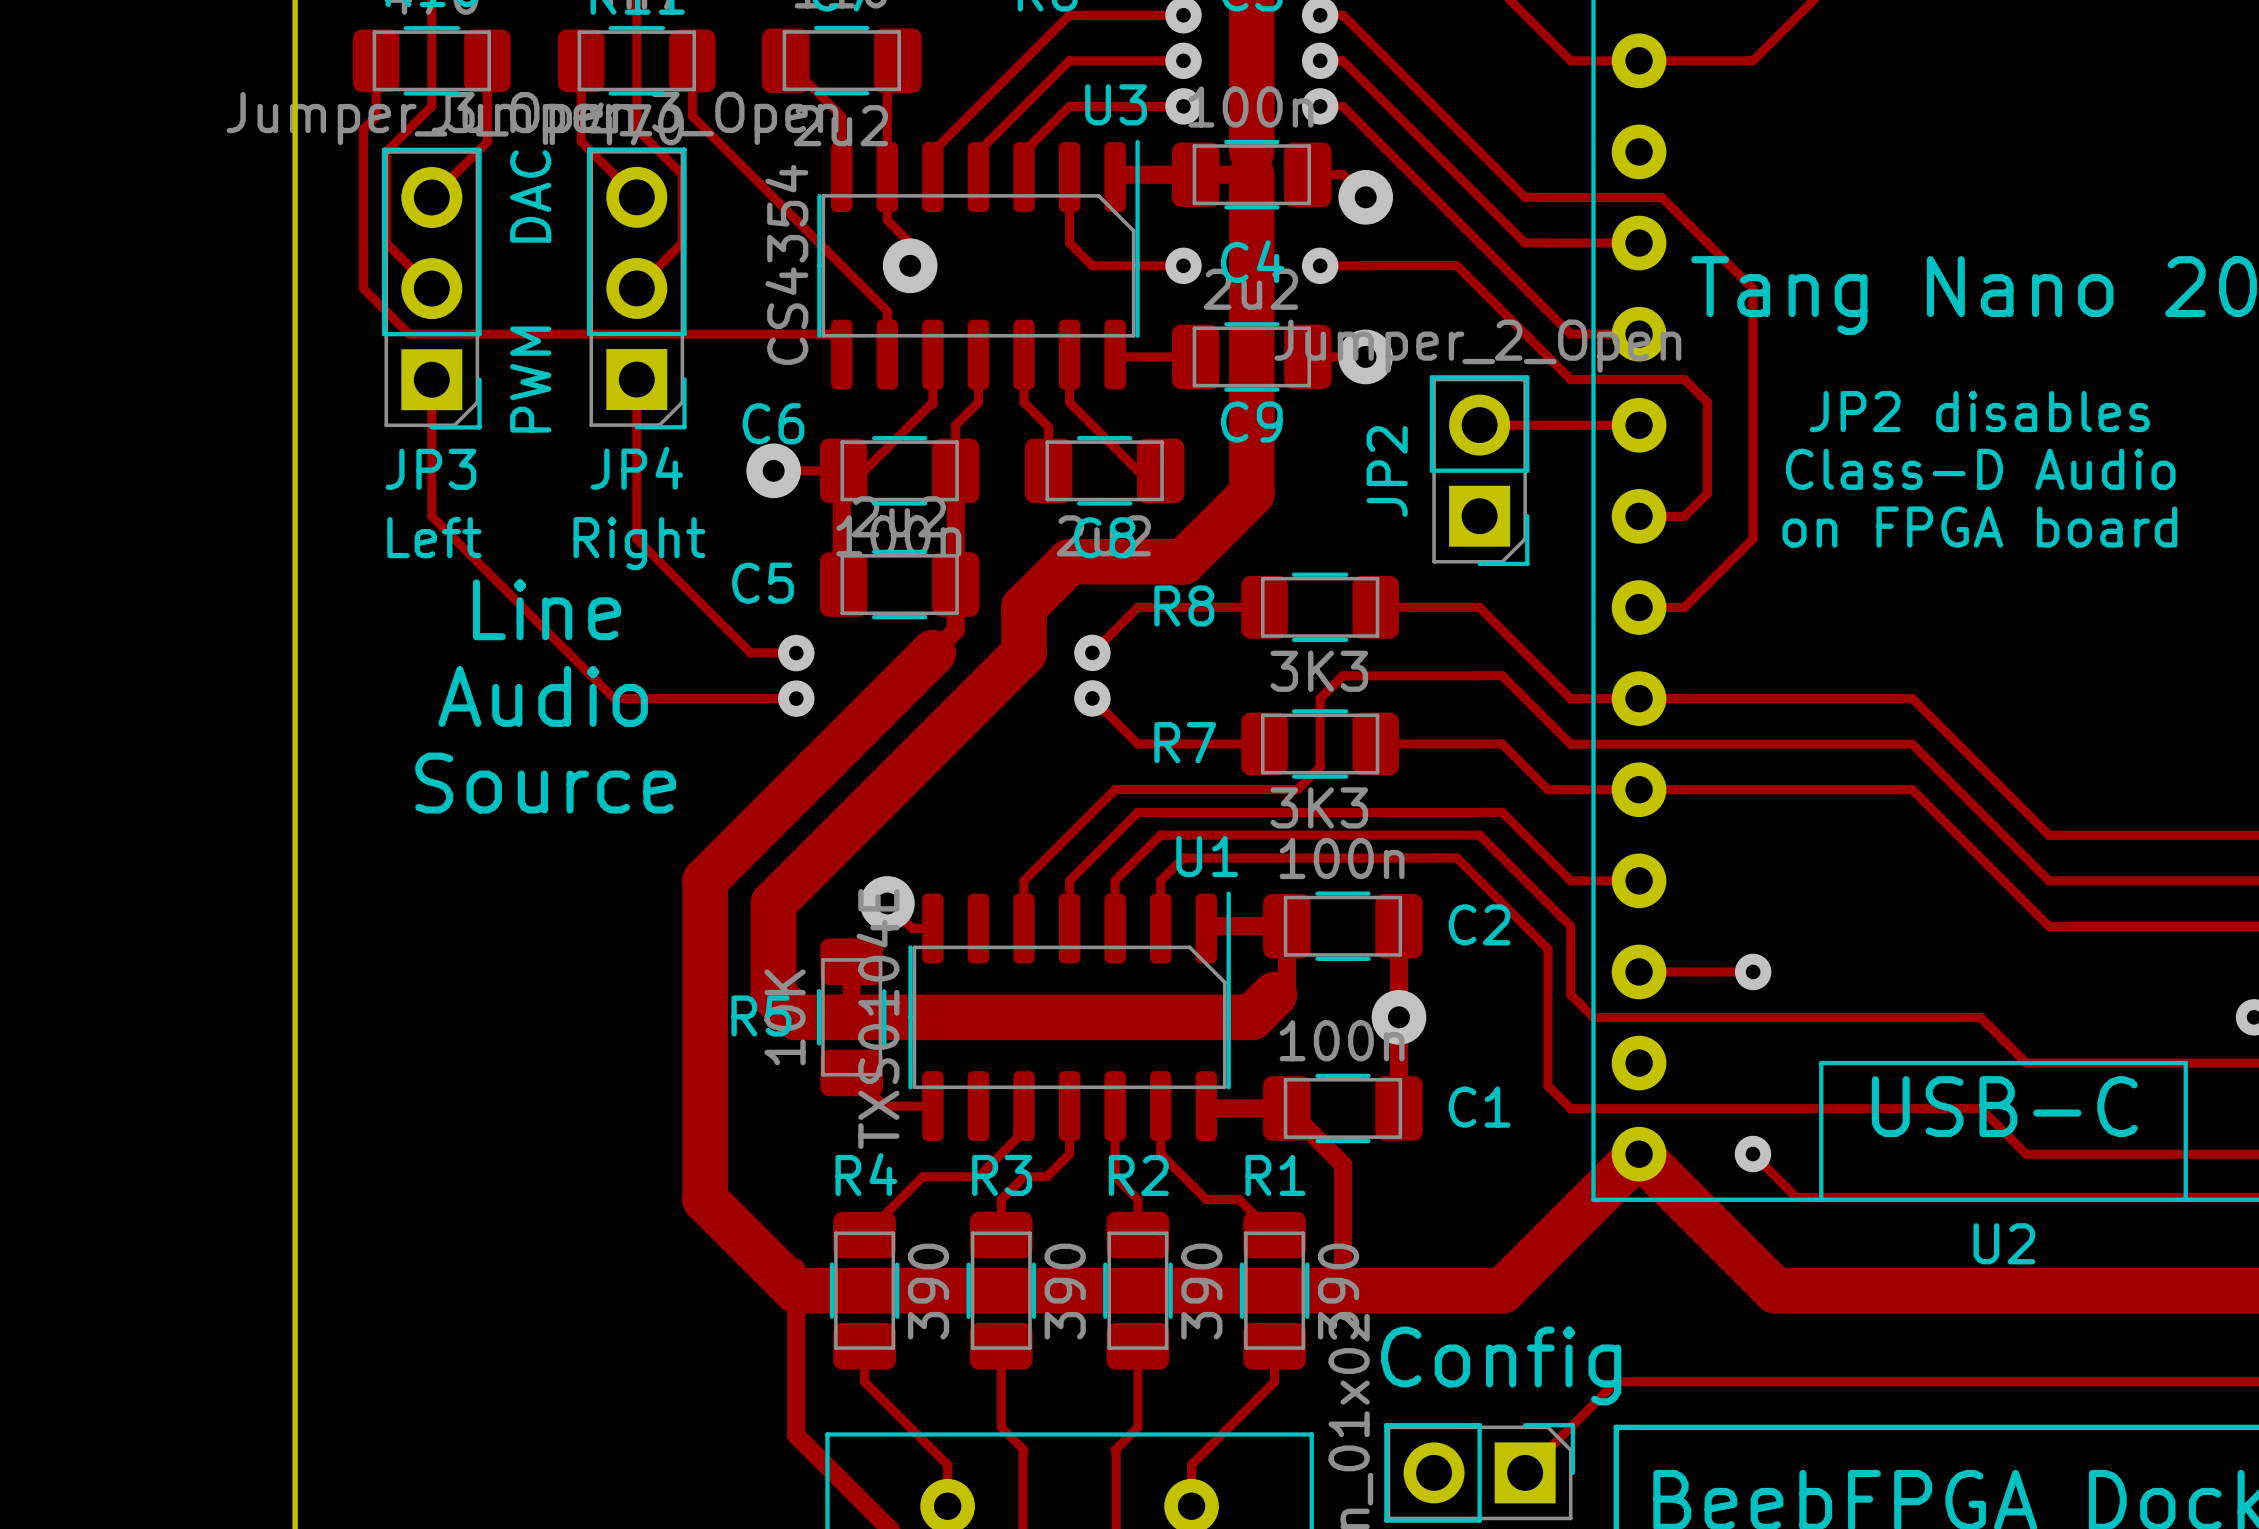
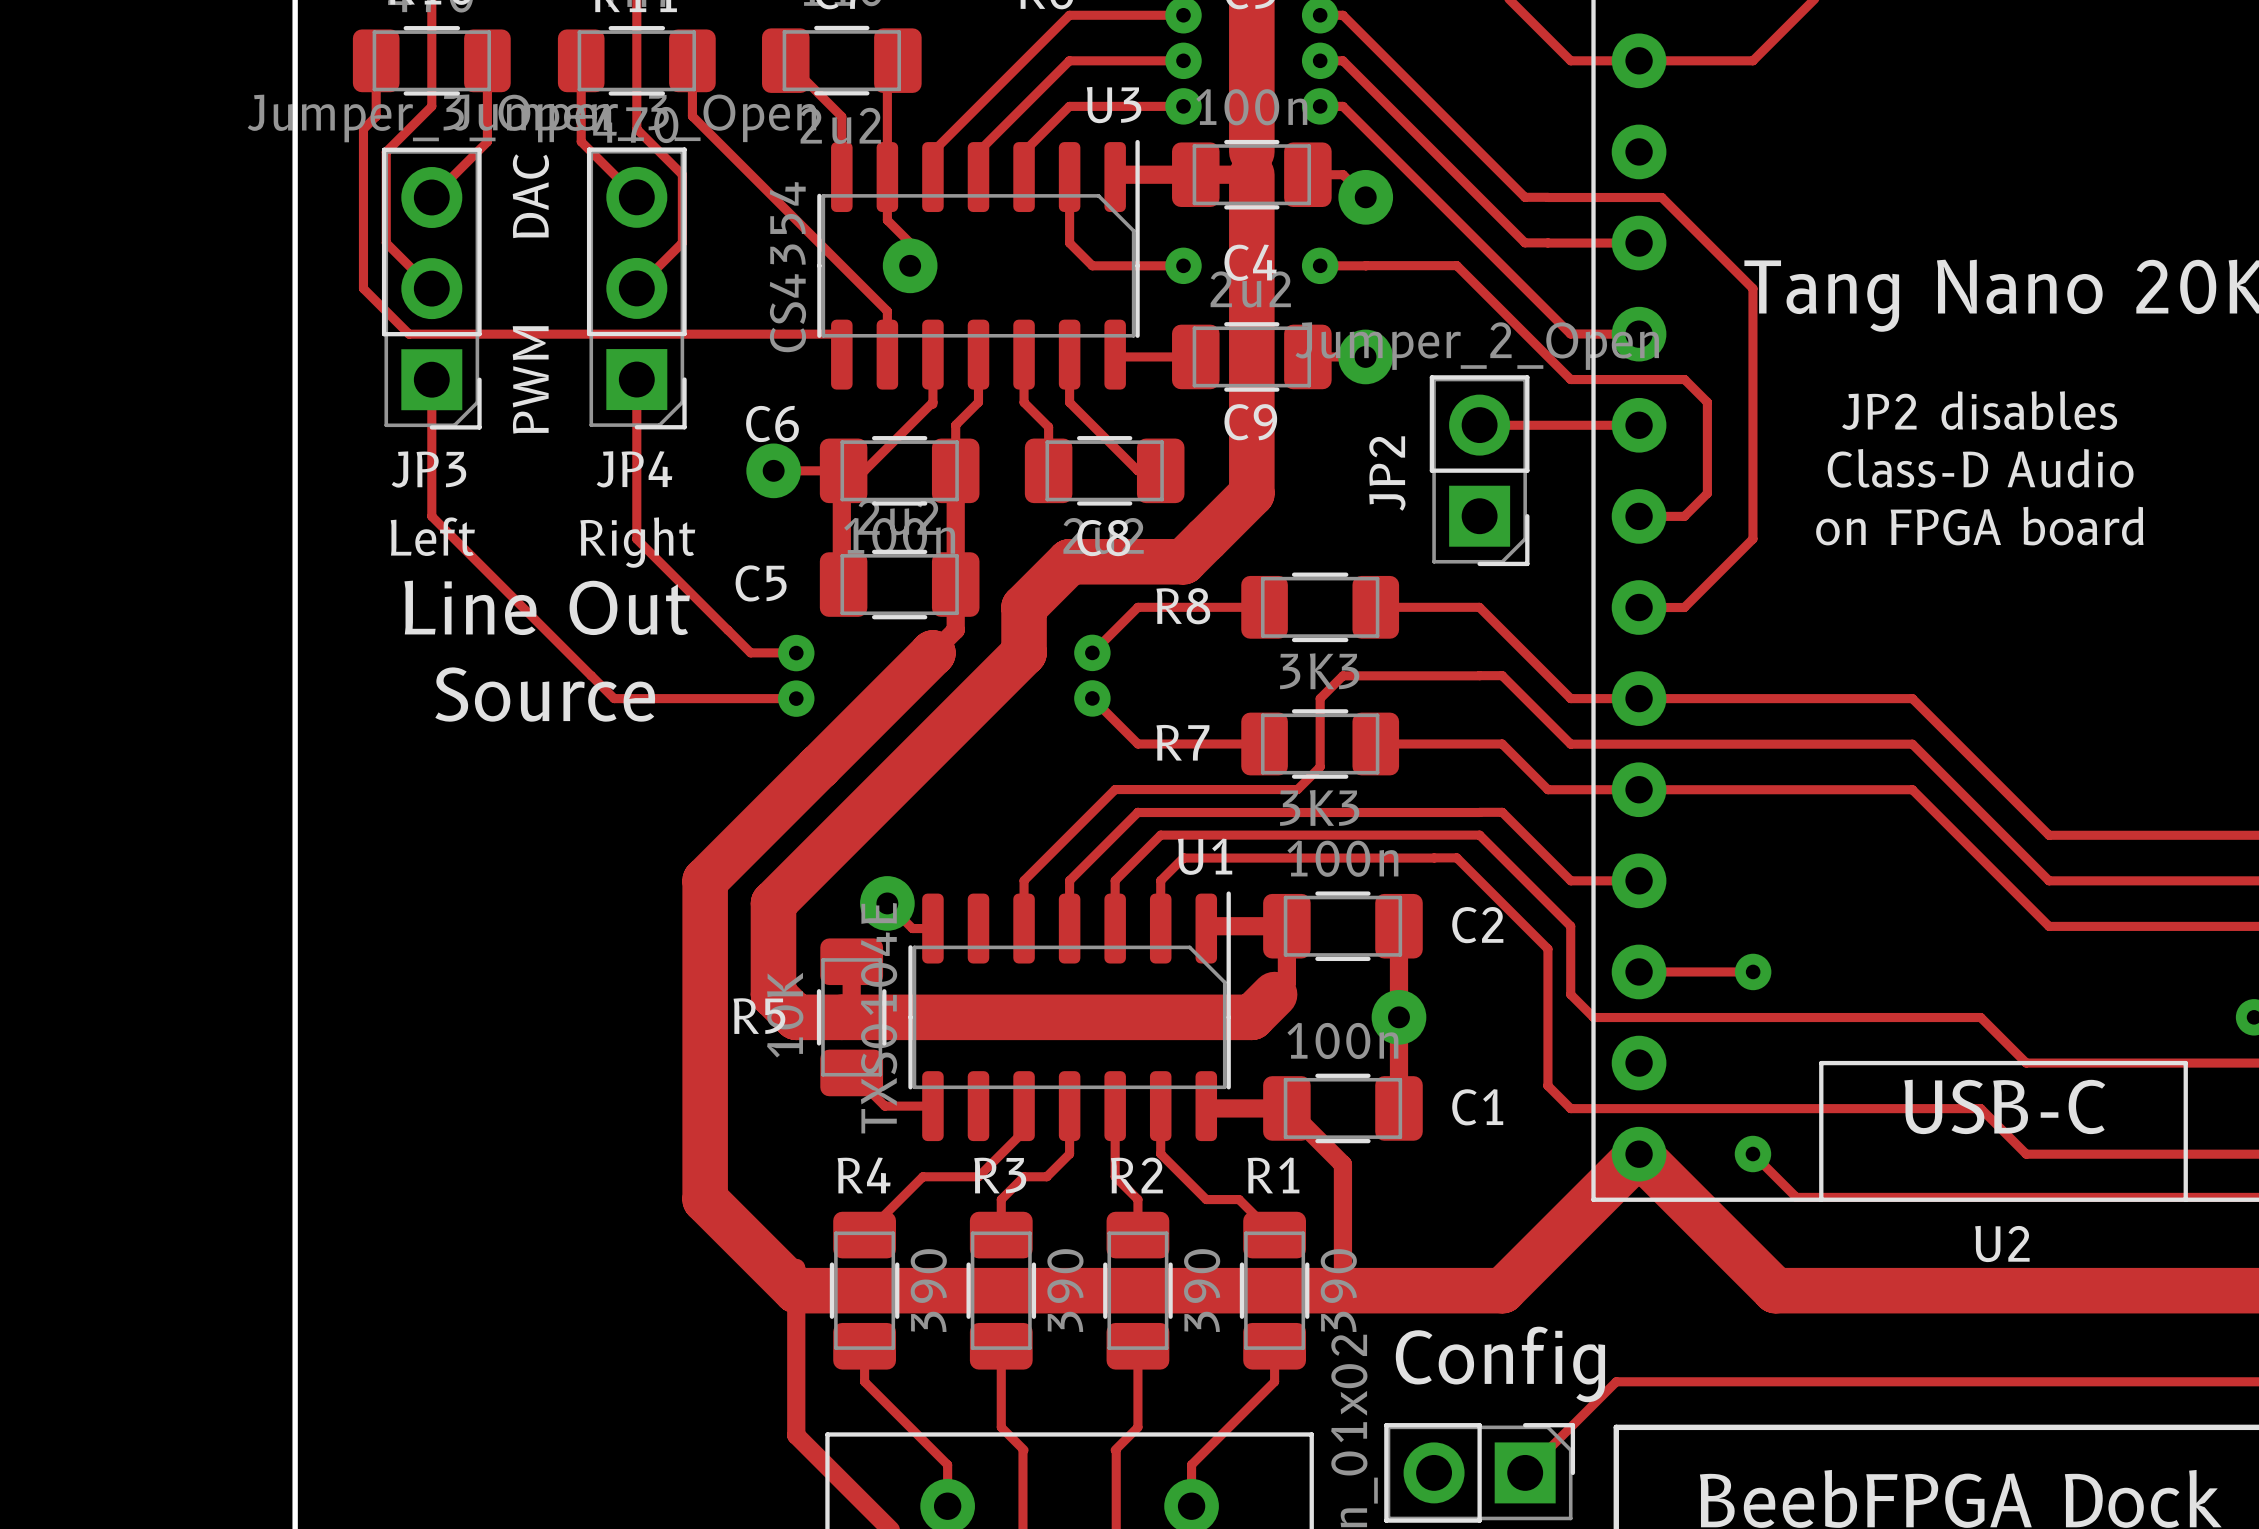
text: Line (546, 609) -> Line Out (547, 607)
text: Audio (543, 696) -> Source (545, 694)
text: Source (545, 783) -> none

